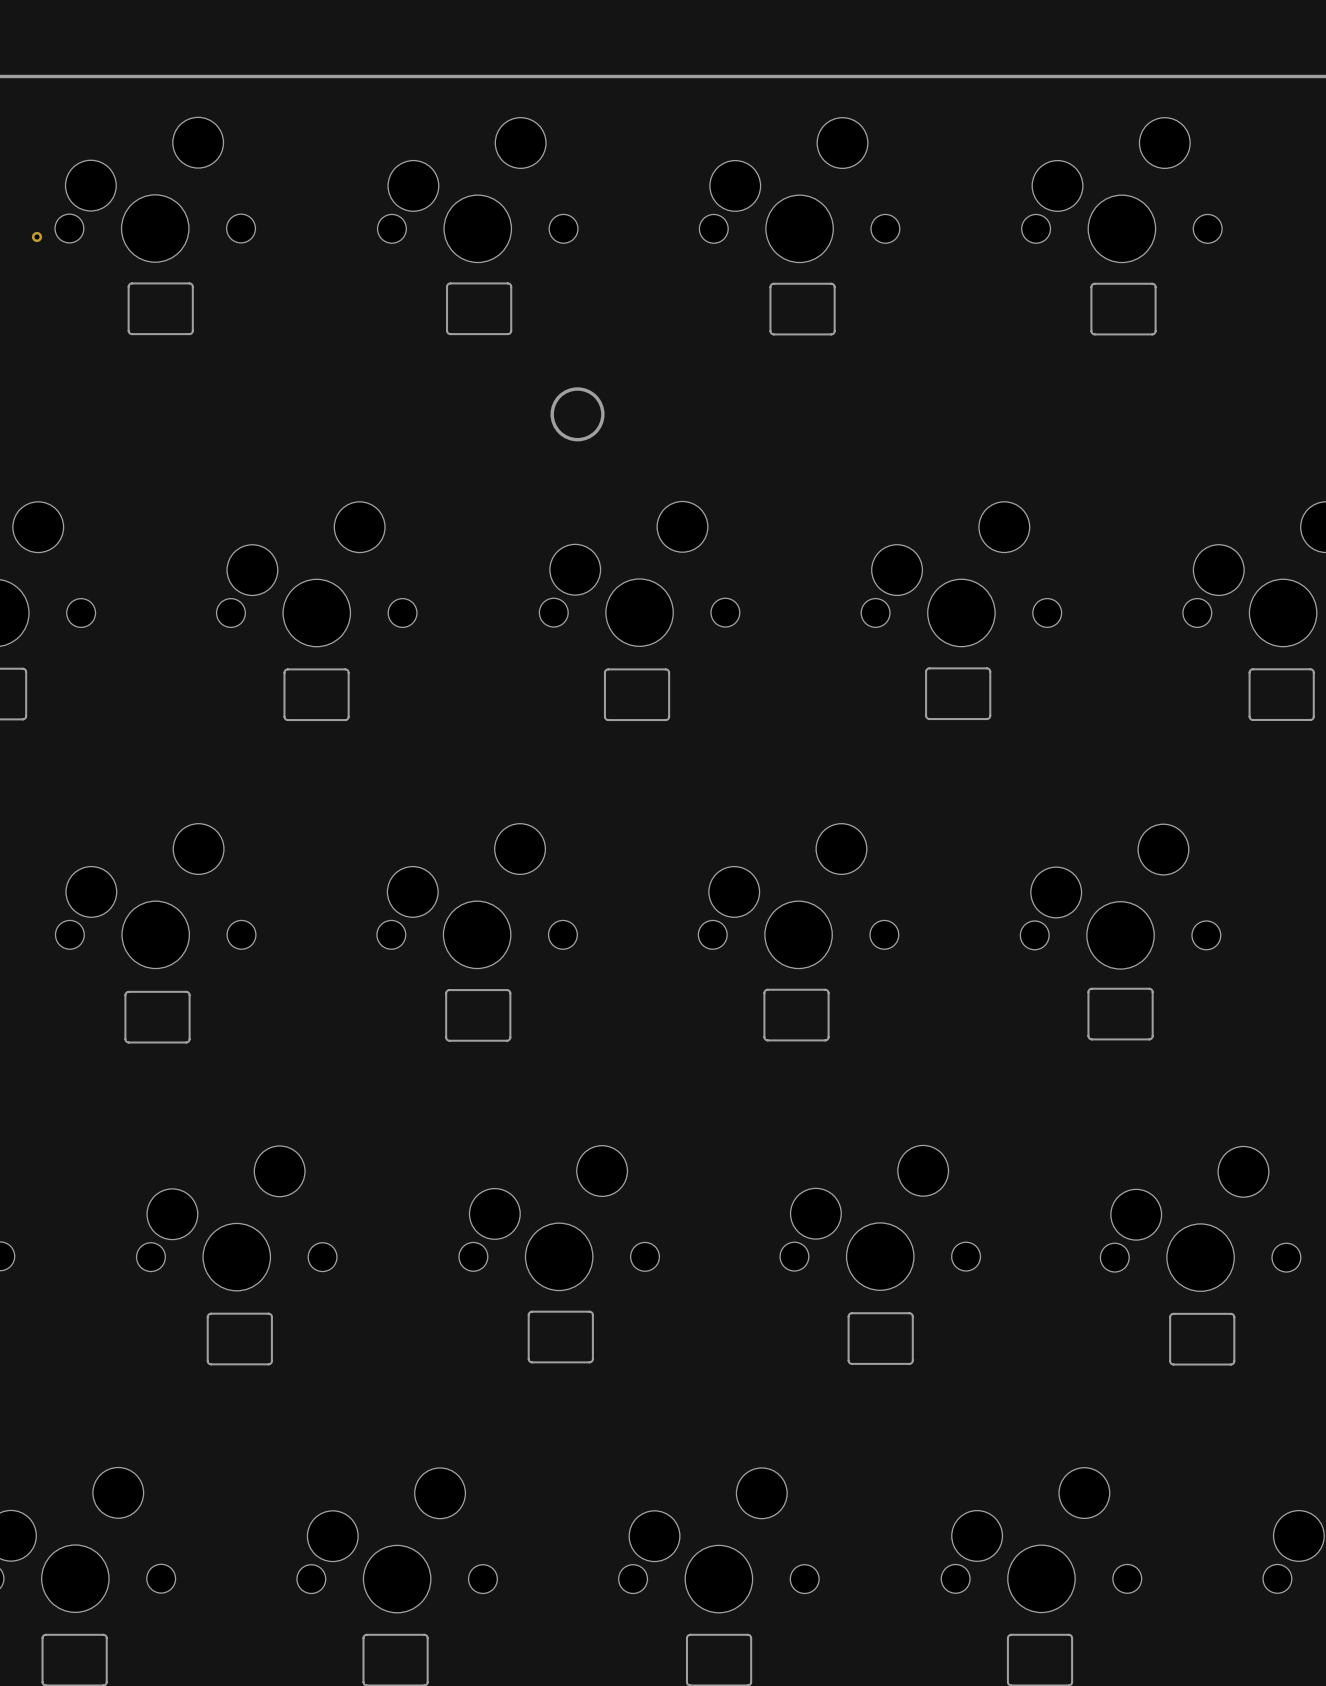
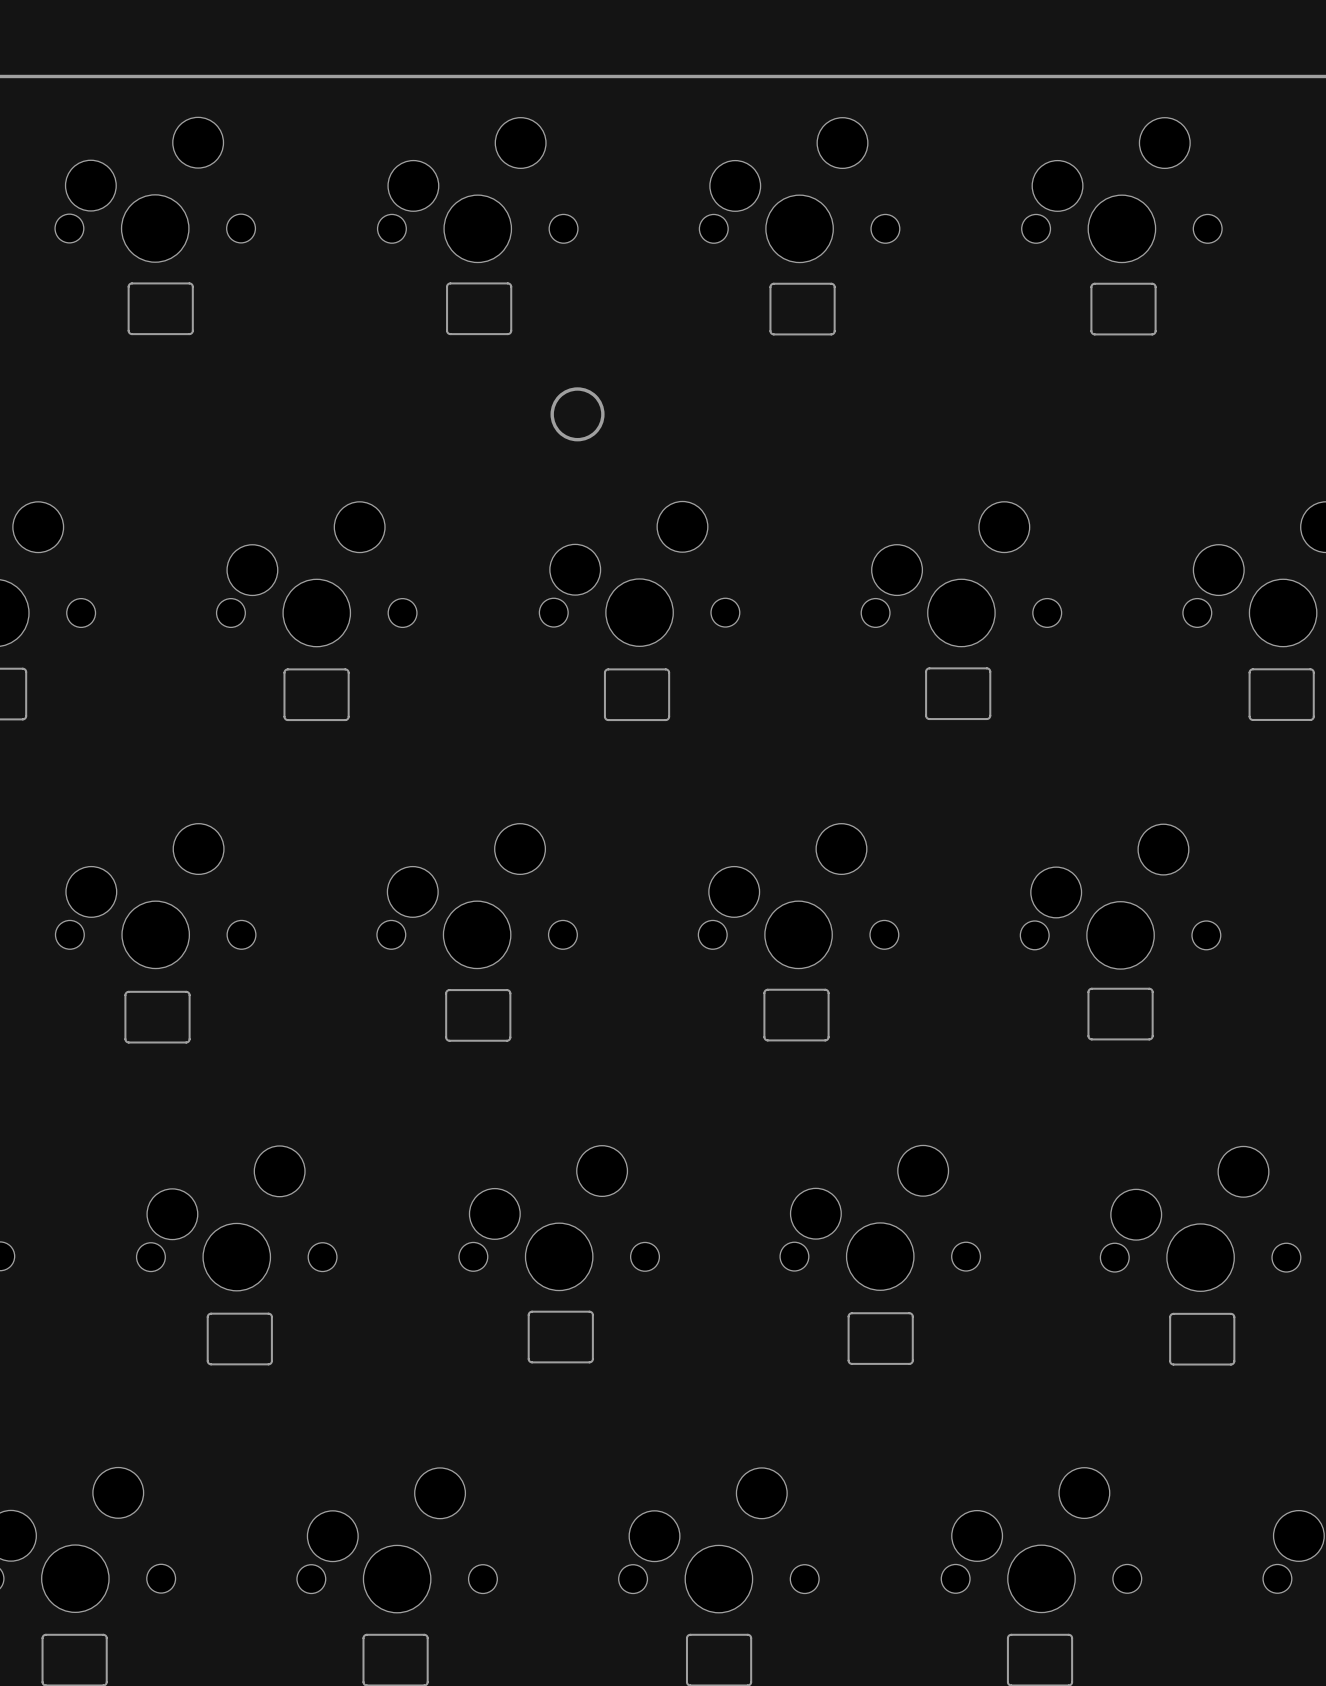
via: (36, 236) -> none

